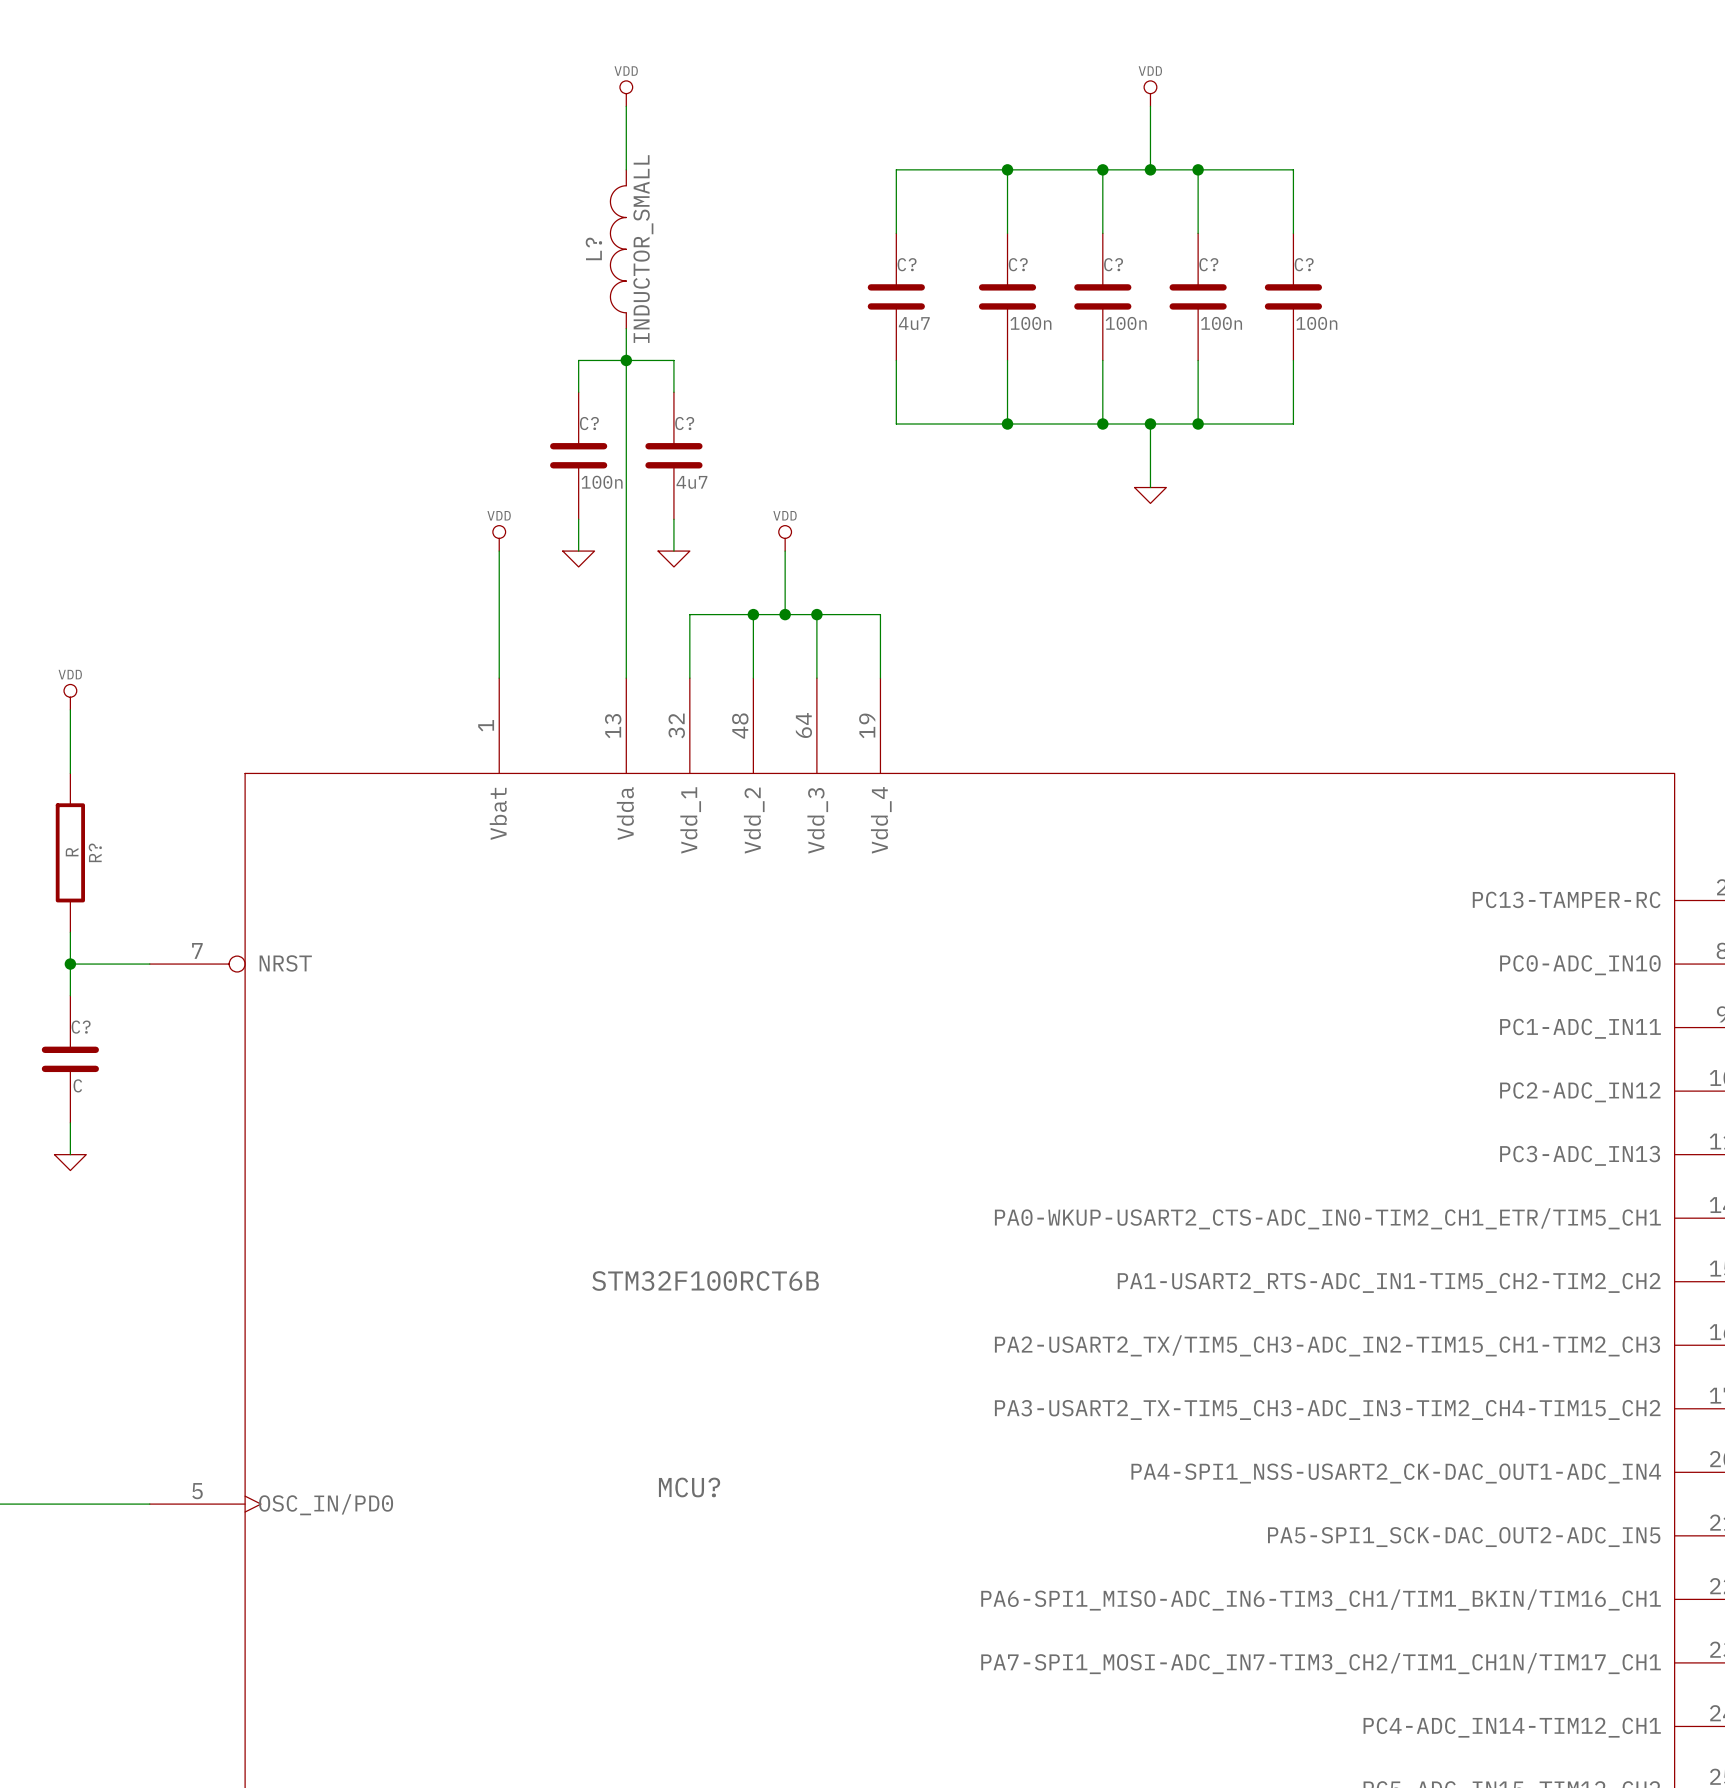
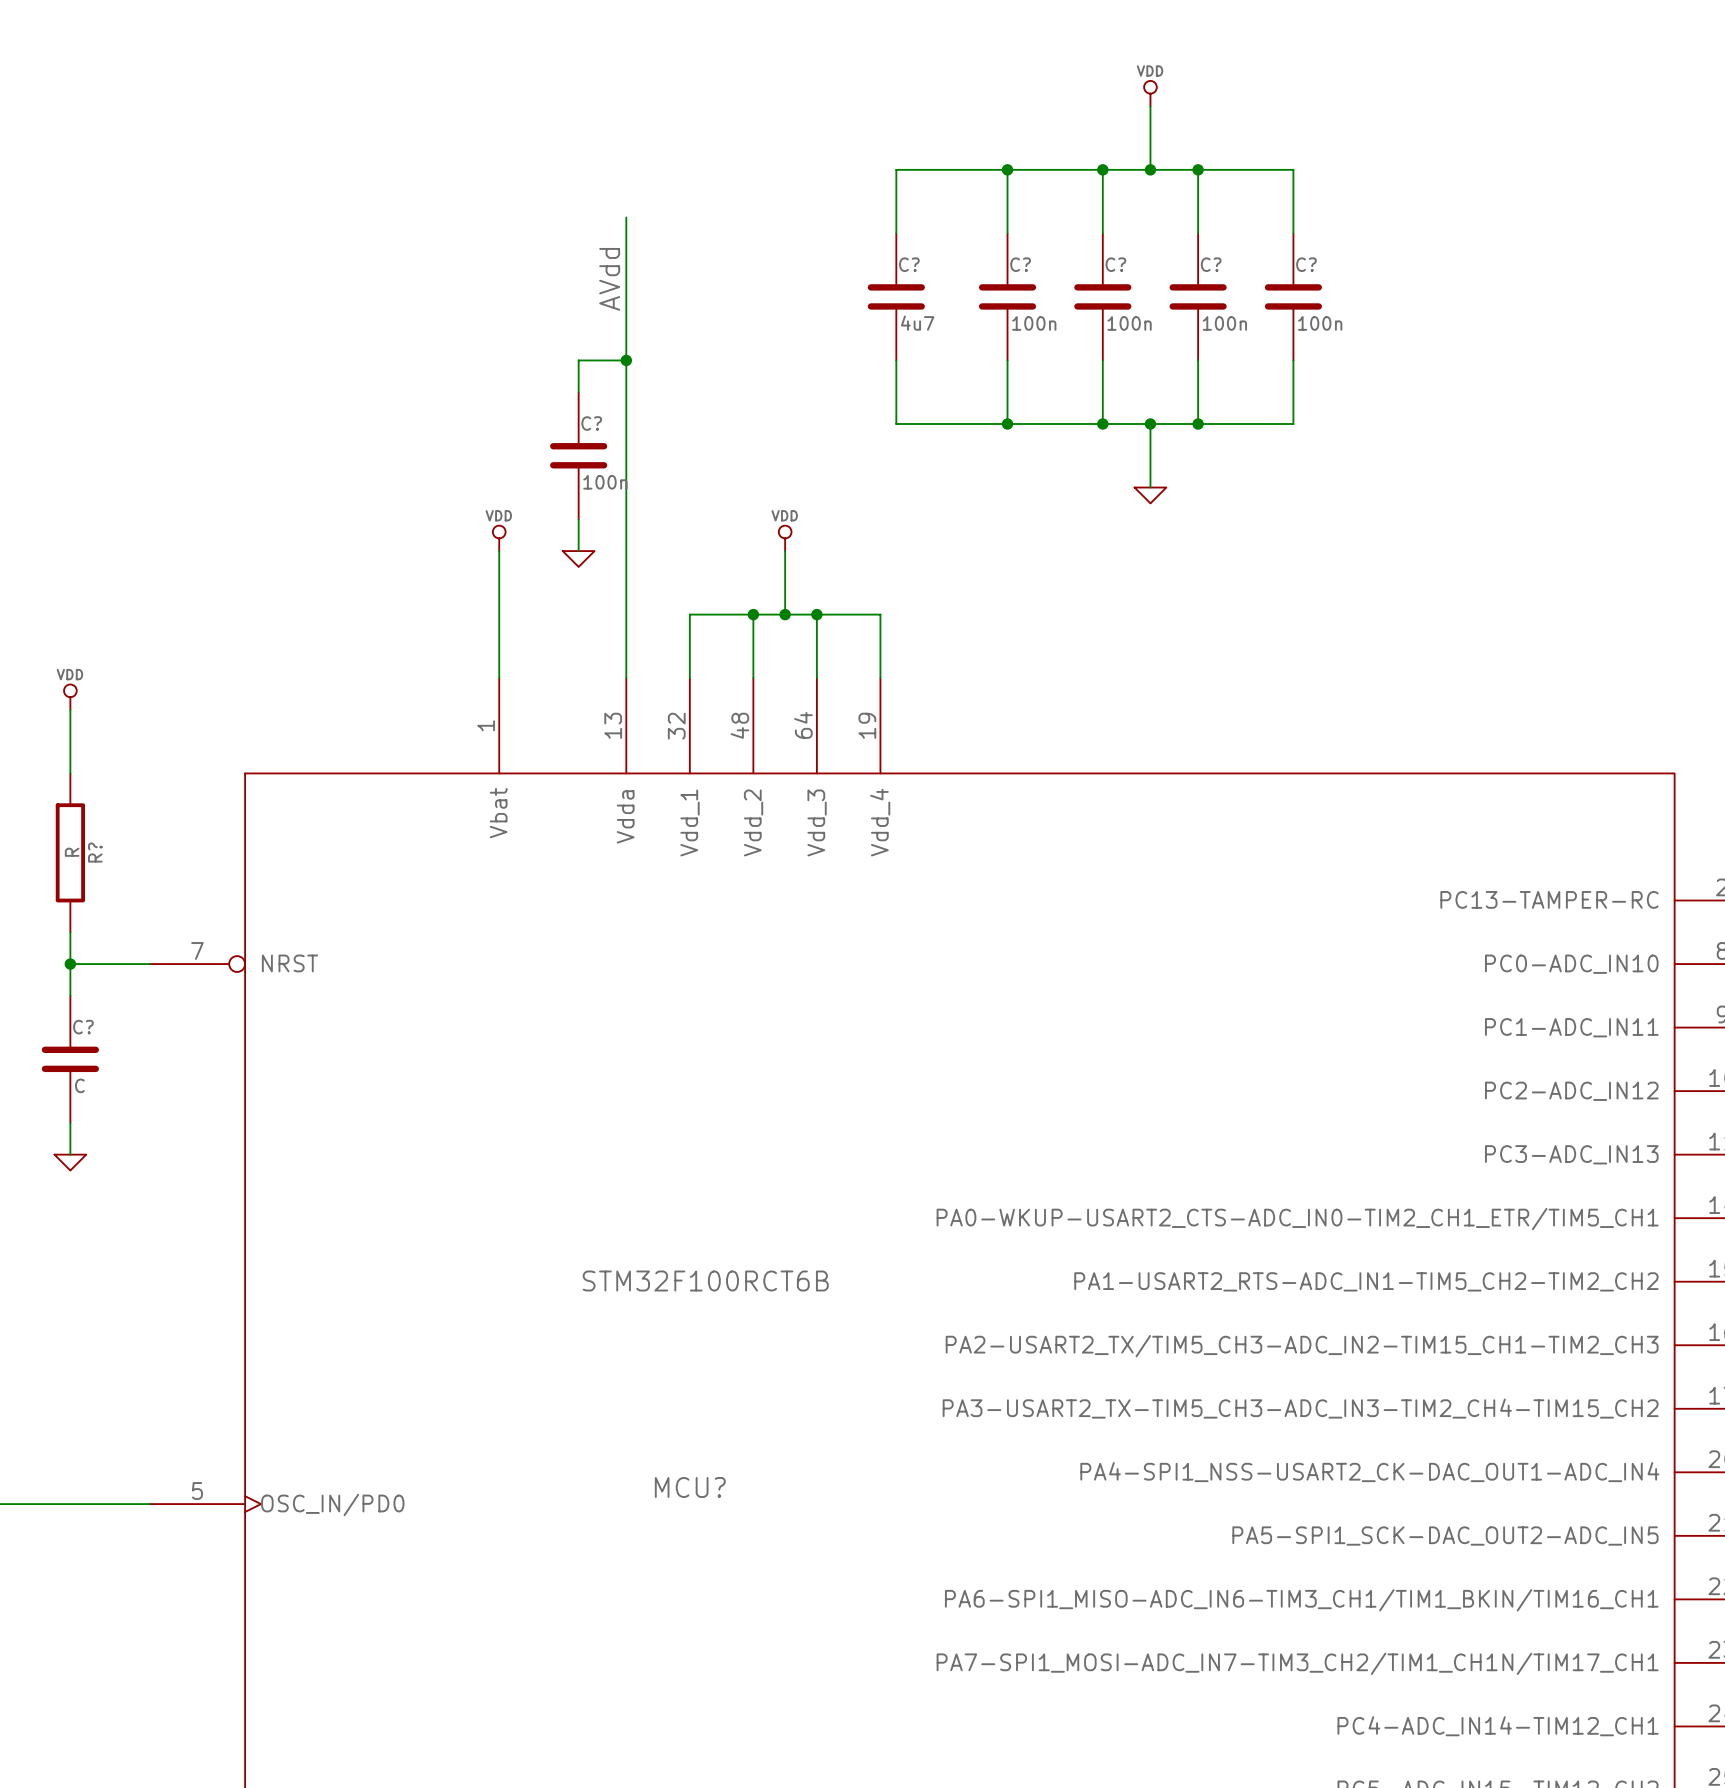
power symbol: VDD (626, 93) -> none
wire: (626, 106) (626, 169) -> none
wire: none -> (626, 217) (626, 328)
L?: INDUCTOR_SMALL (618, 249) -> none
label: none -> AVdd (609, 279)
wire: (626, 360) (673, 360) (673, 392) -> none
C?: 4u7 (673, 455) -> none
wire: (673, 519) (673, 551) -> none
power symbol: (673, 559) -> none

